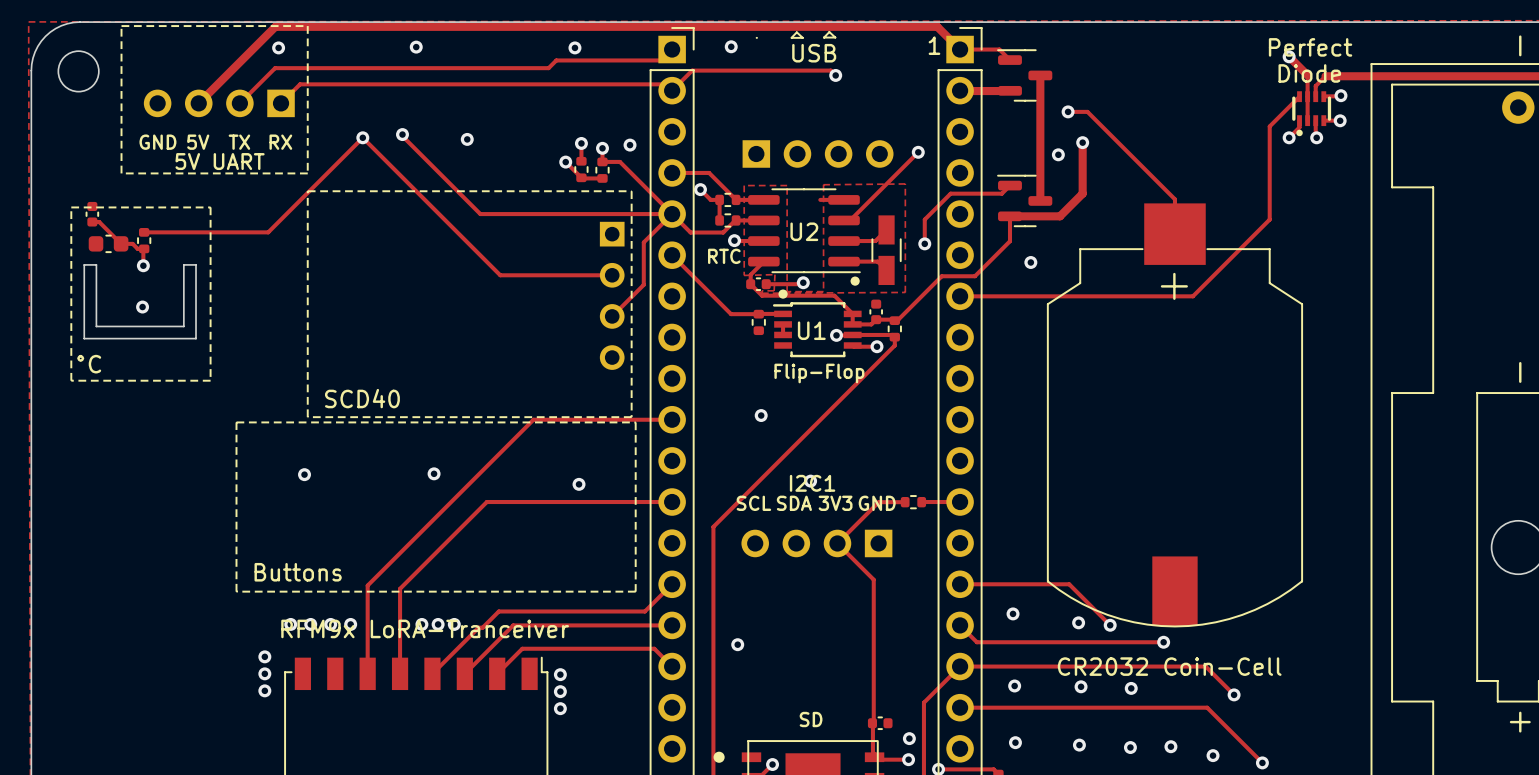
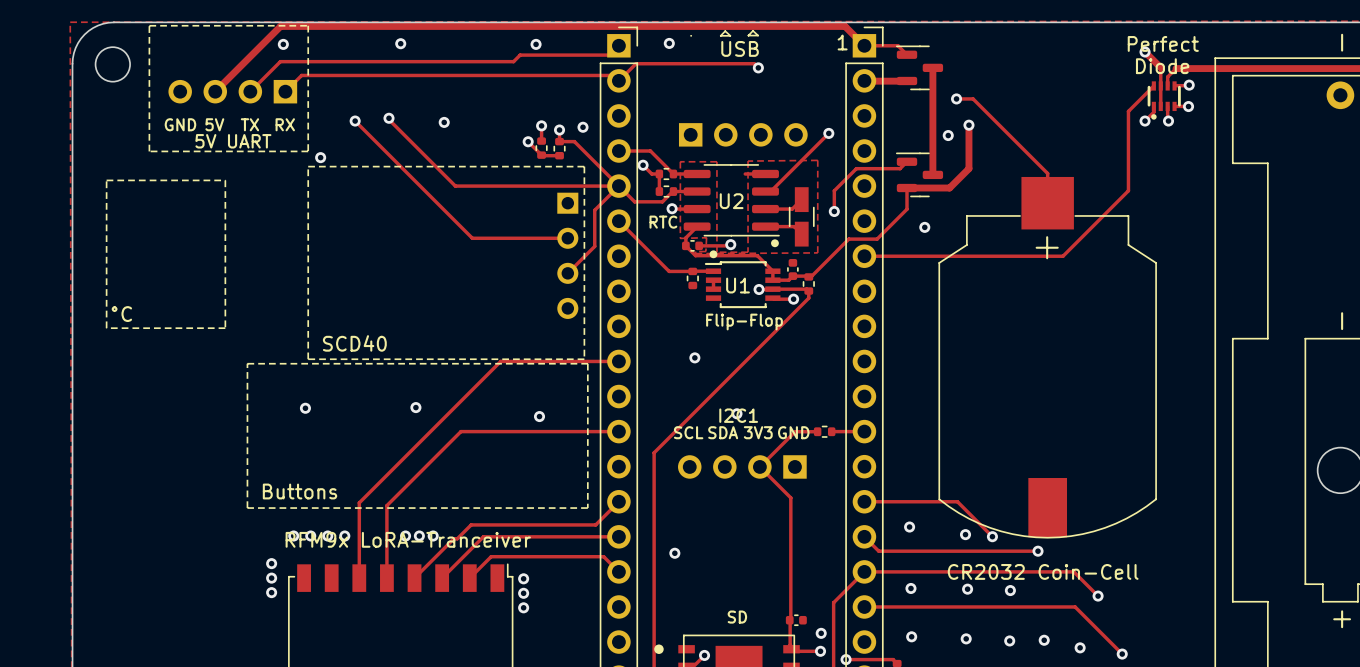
track: (362, 137) (268, 232) (144, 232) -> none
via: none -> (320, 157)
part: (92, 214) -> none
track: (92, 222) (99, 222) (121, 243) (132, 243) (137, 248) (144, 248) (143, 265) -> none
part: (144, 240) -> none
part: (108, 243) -> none
board edge: (84, 264) (96, 264) (96, 326) (183, 326) (183, 264) (196, 264) (196, 338) (84, 338) (84, 264) -> none
via: (143, 265) -> none
via: (142, 307) -> none

